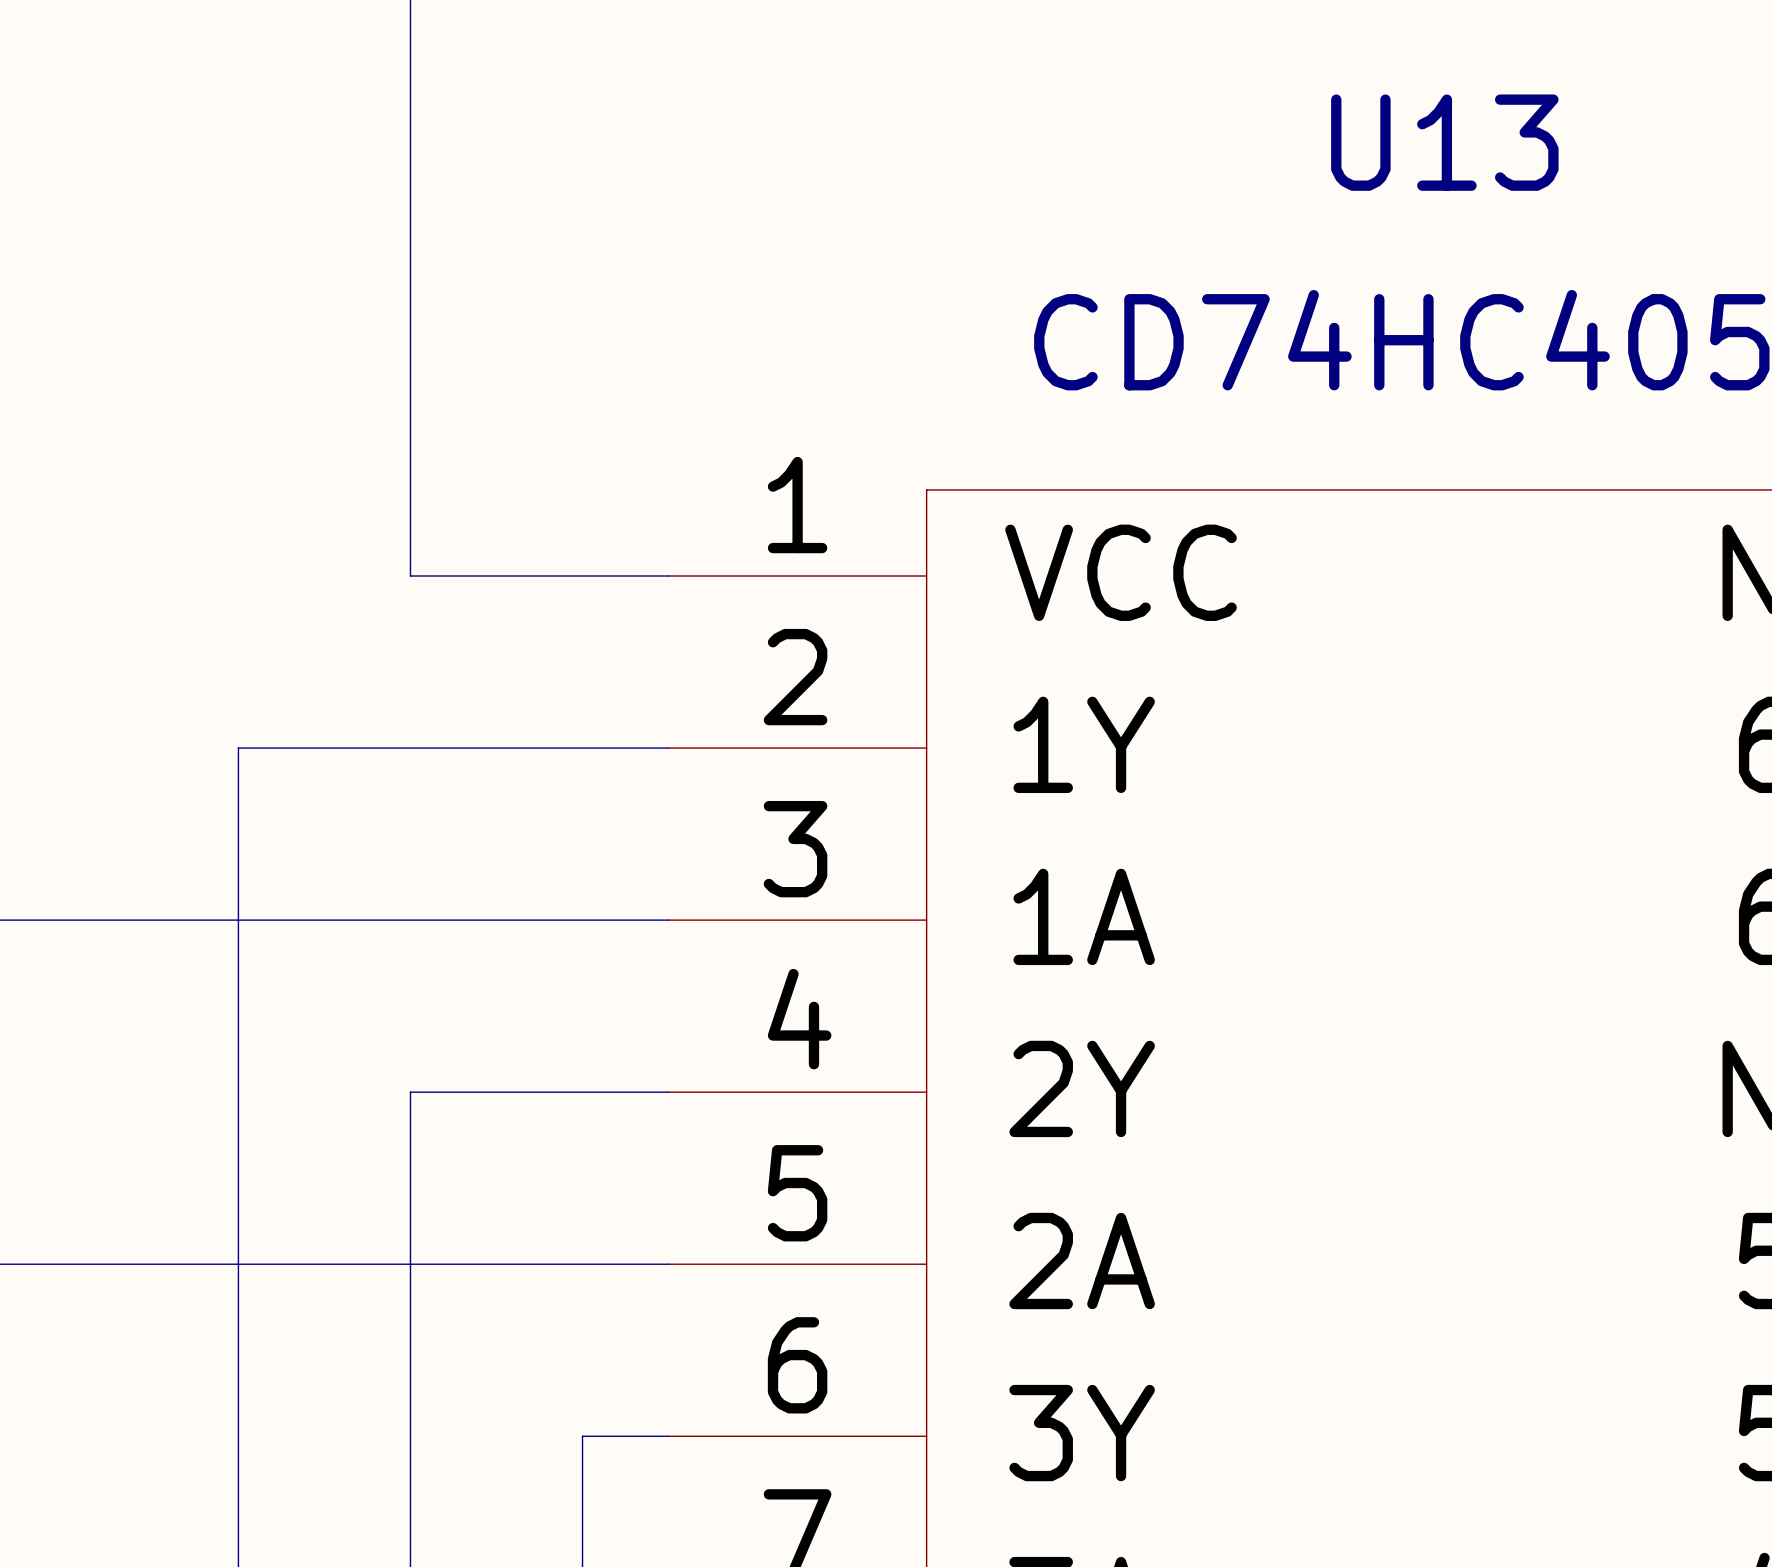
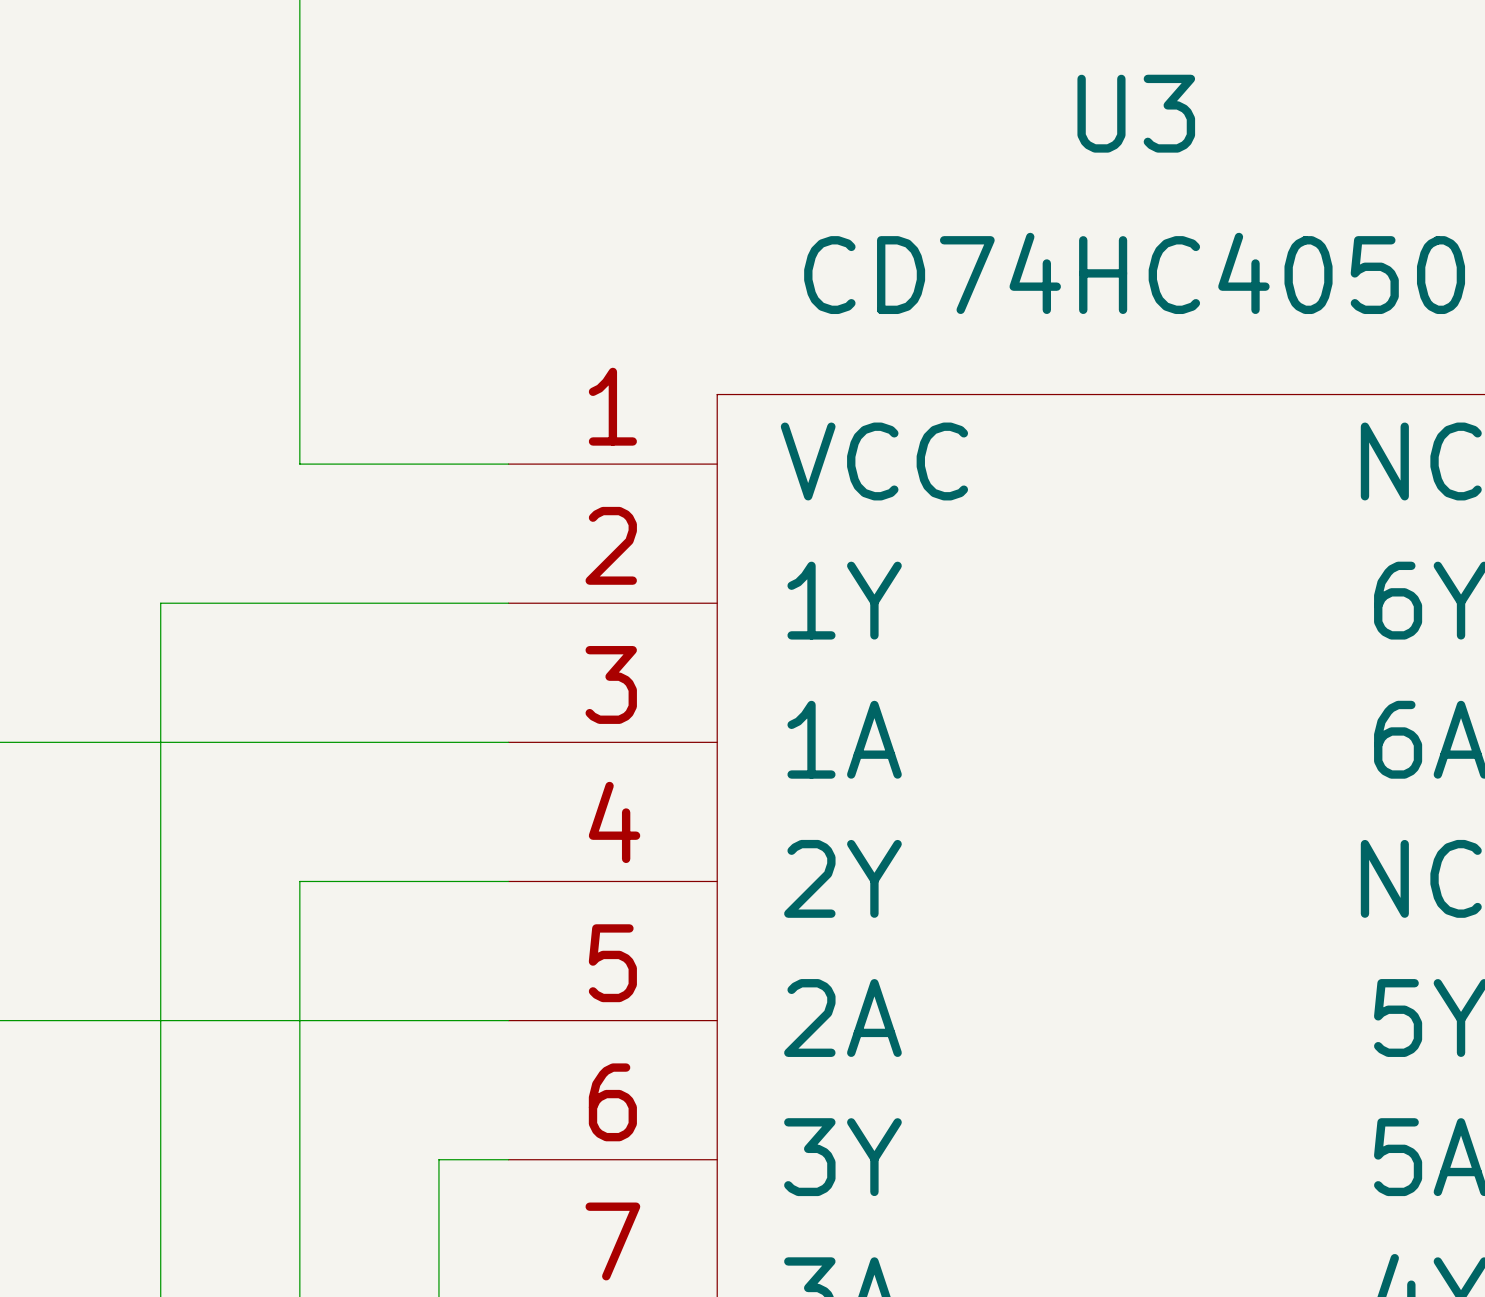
U13 name: U13 (1444, 142) -> U3 (1136, 113)

